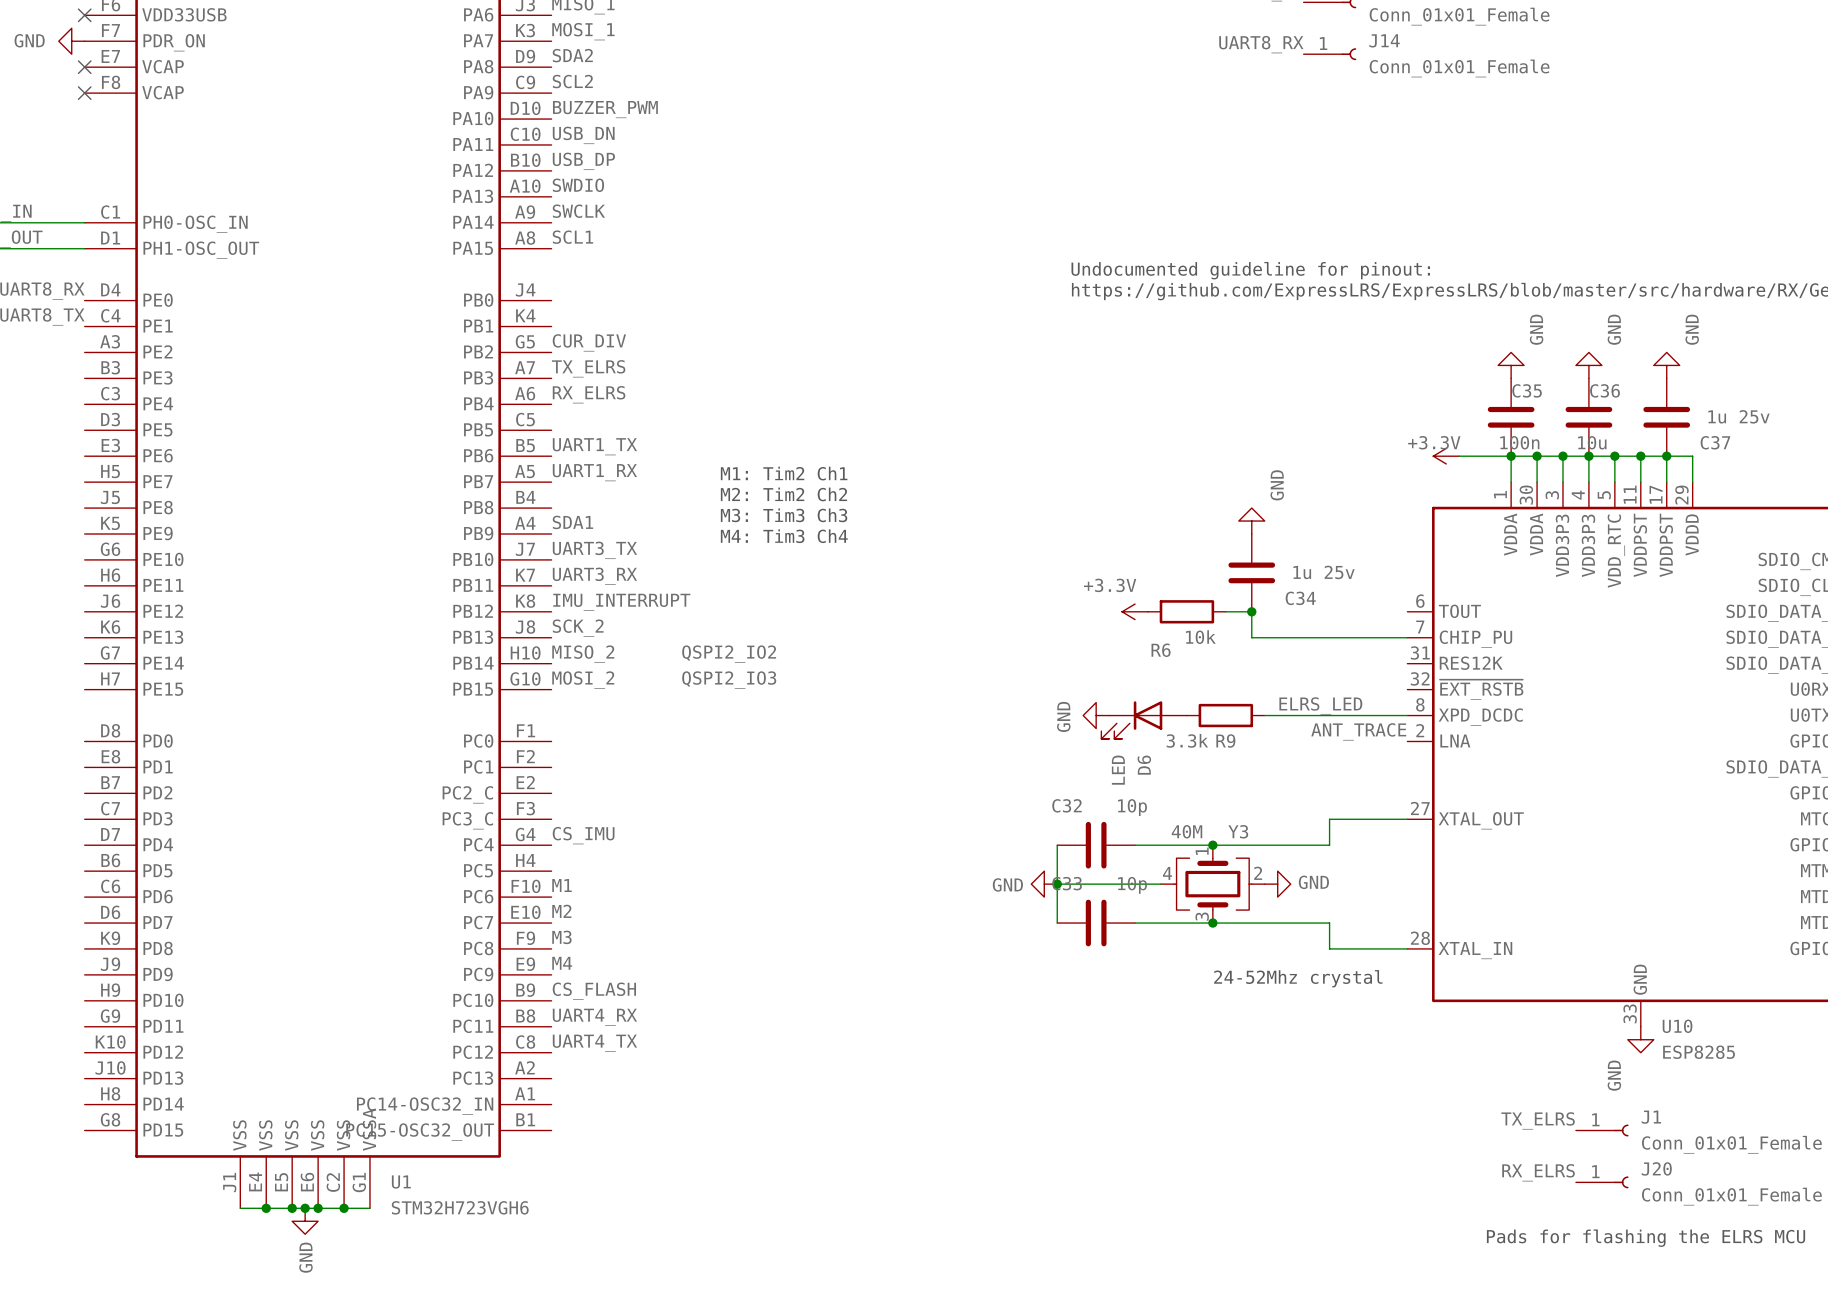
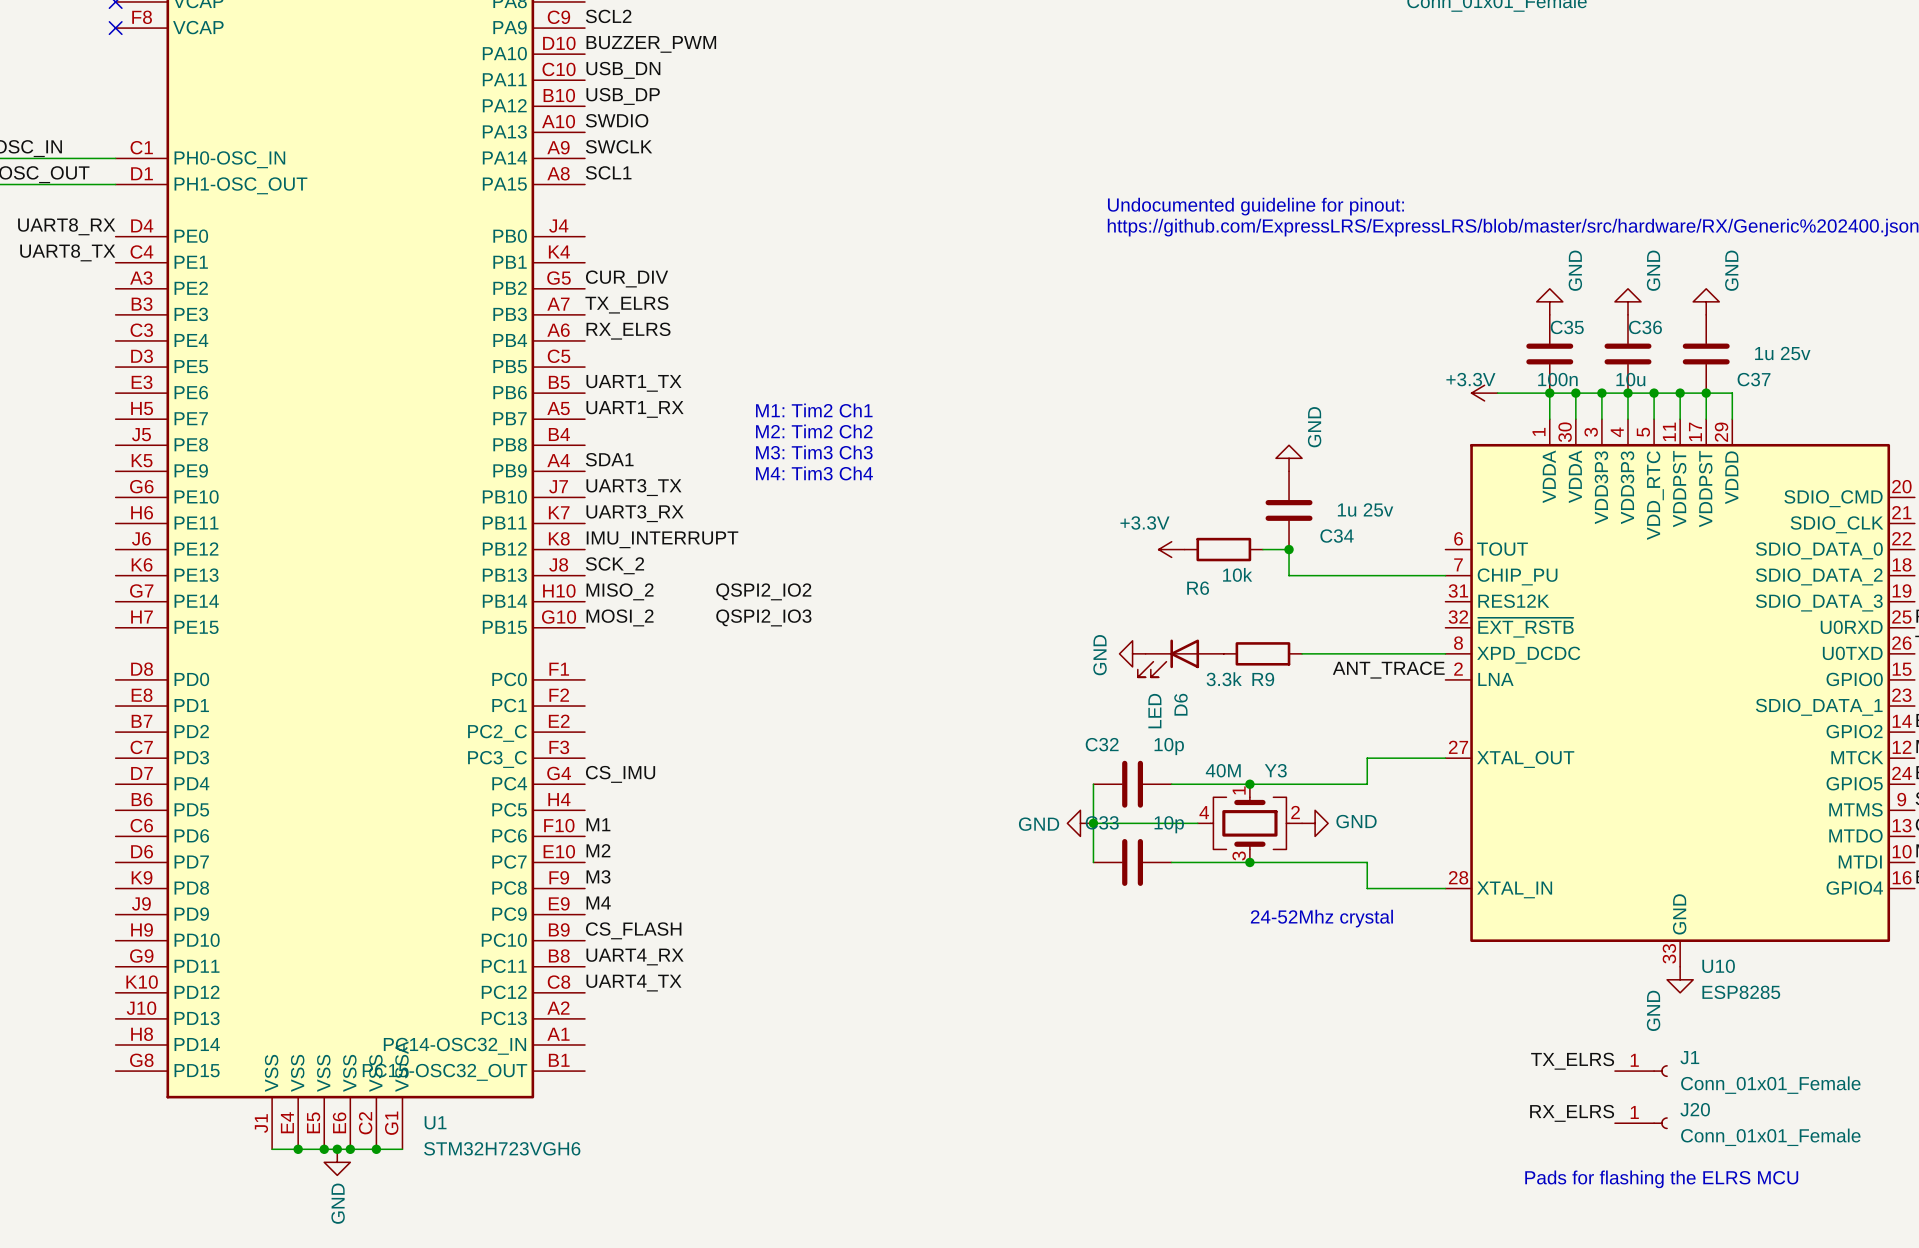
label: ELRS_LED (1320, 705) -> none

